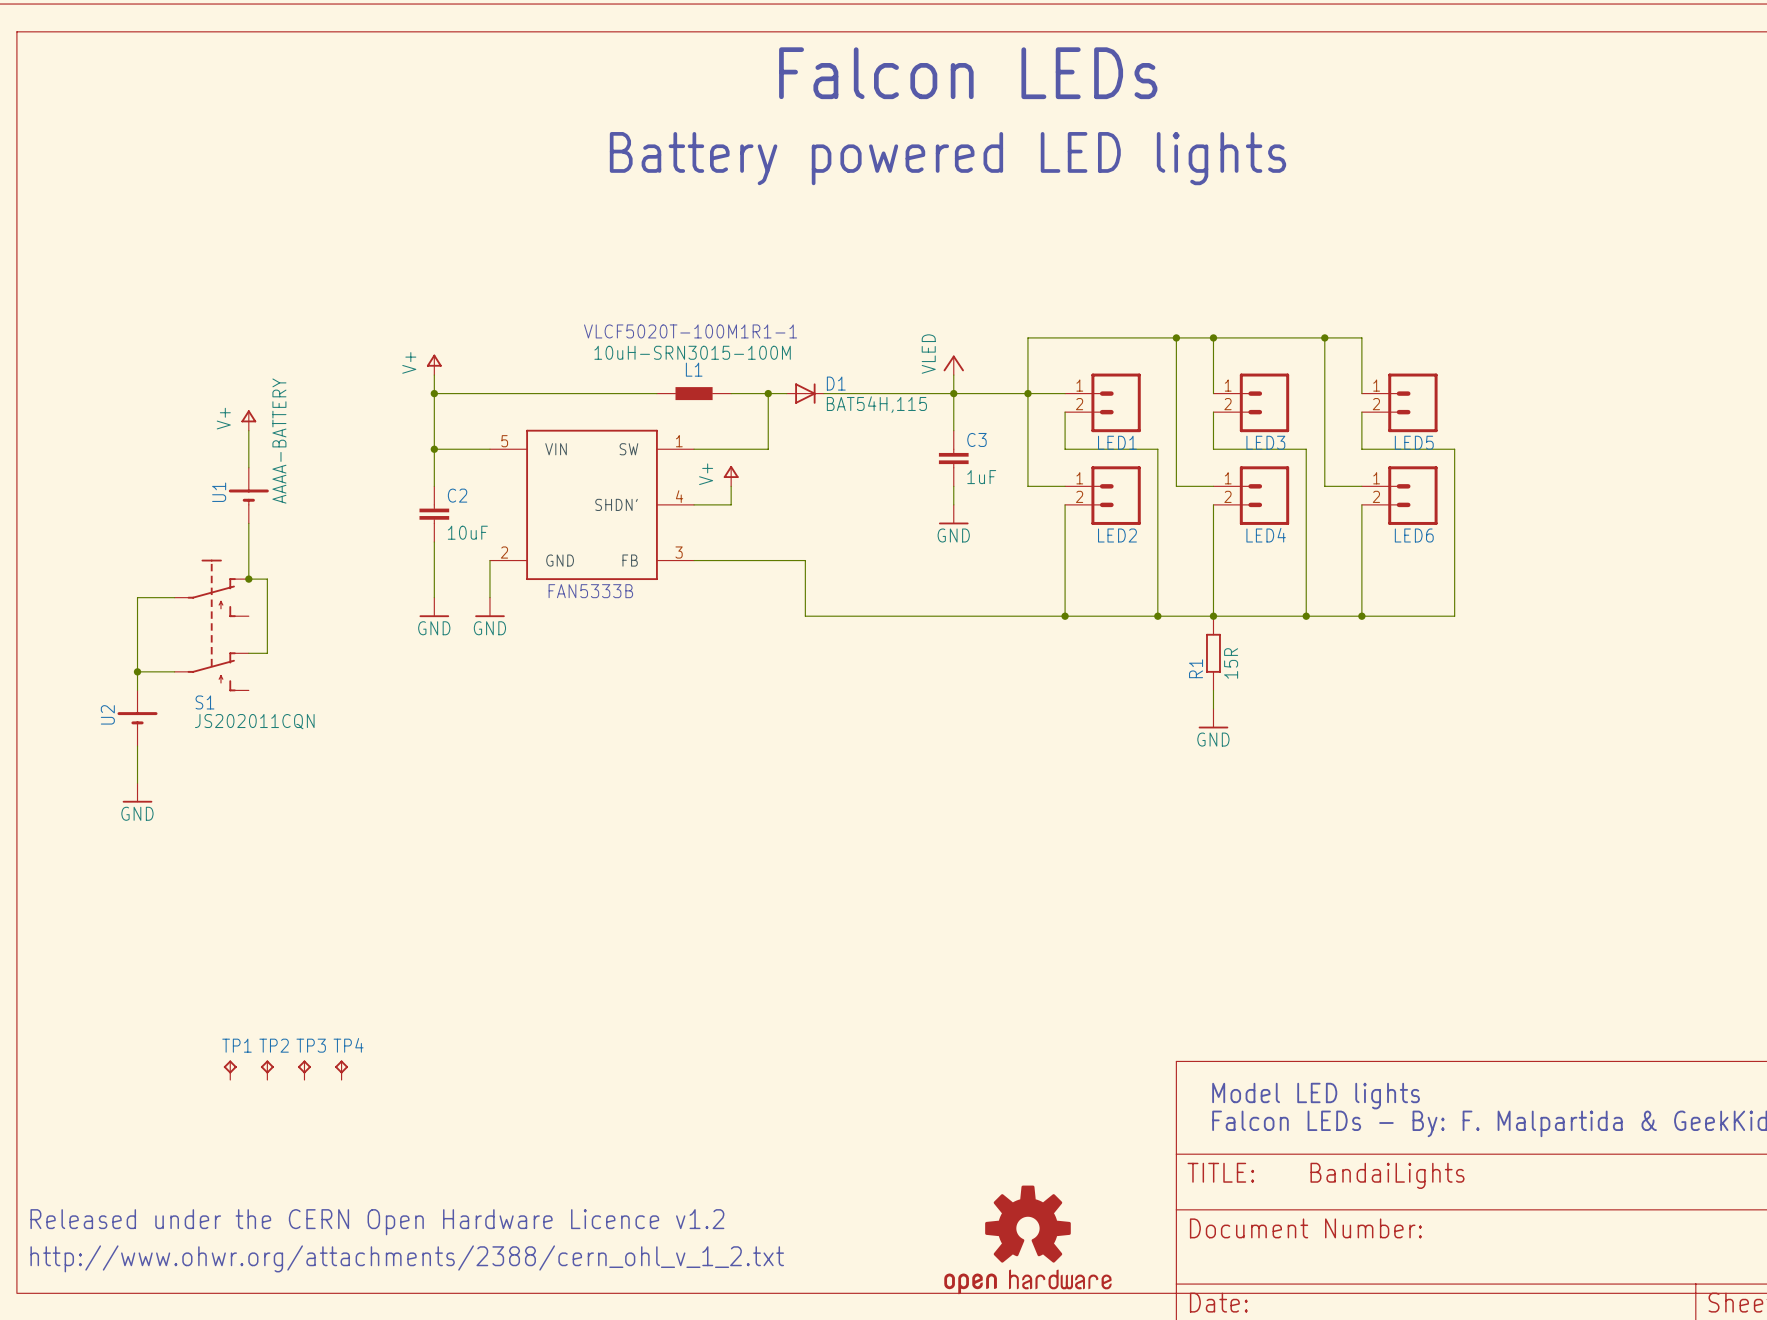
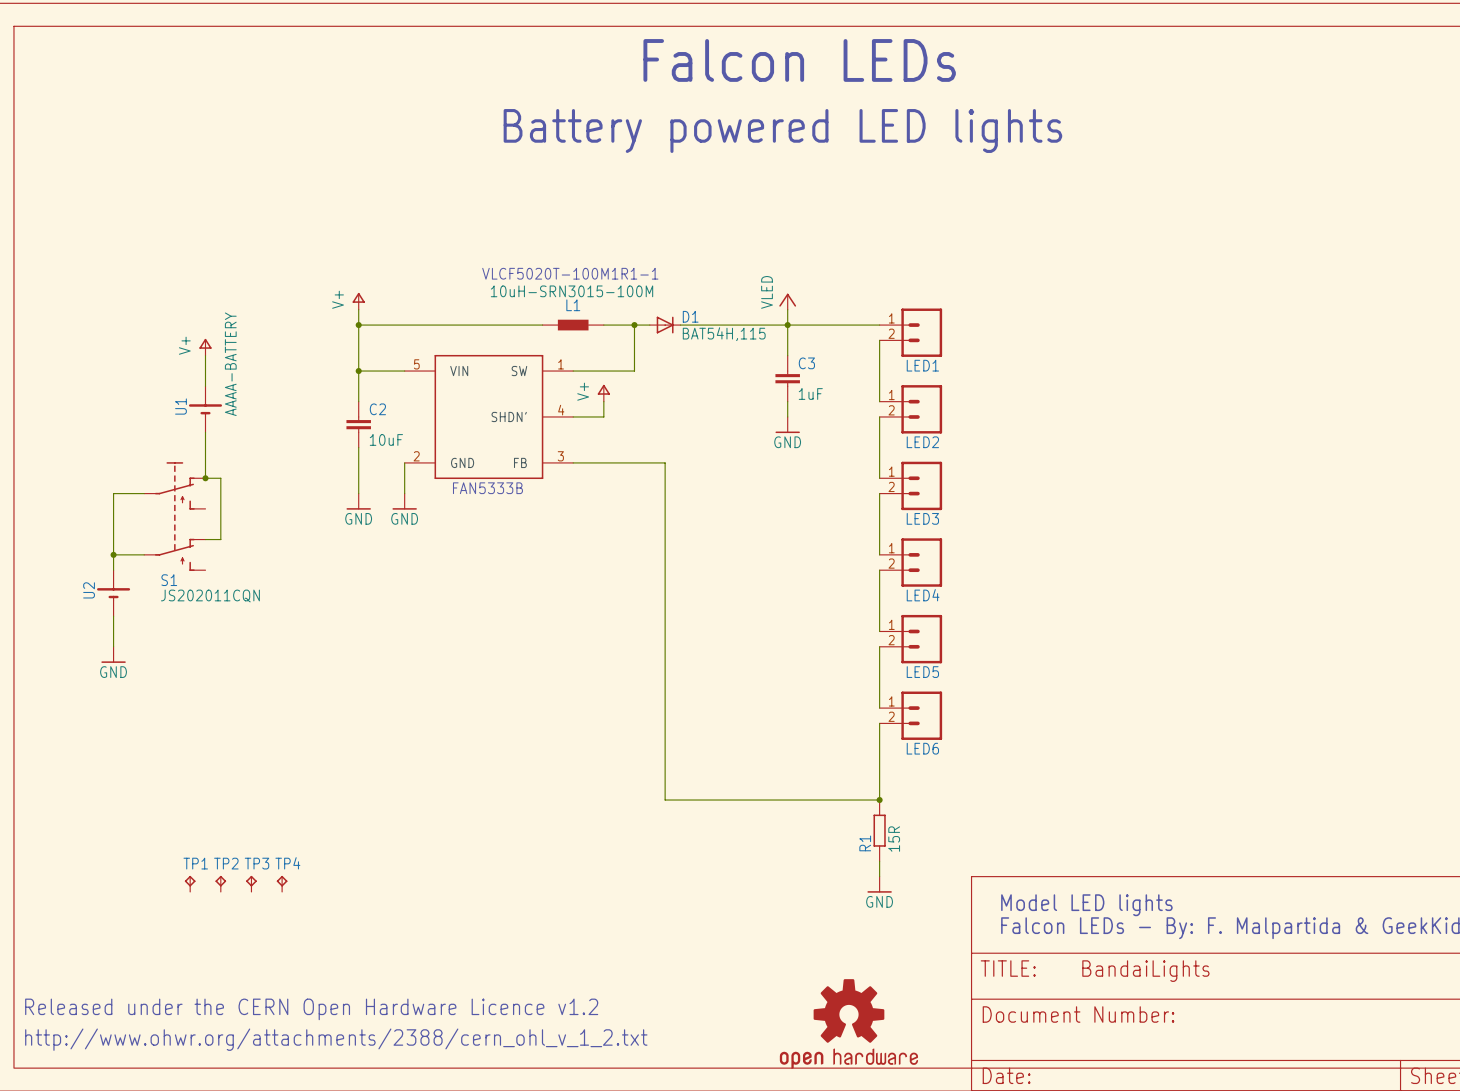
wire: (1176, 337) (1176, 486) (1213, 486) -> none
junction: (1176, 337) -> none
wire: (1213, 337) (1213, 393) -> none
junction: (1213, 337) -> none
wire: (1324, 337) (1324, 486) (1361, 486) -> none
junction: (1324, 337) -> none
junction: (1027, 393) -> none
wire: (1361, 393) (1361, 337) (1027, 337) (1027, 486) (1065, 486) -> none
LED3 position: (1251, 402) -> (910, 485)
LED5 position: (1399, 402) -> (910, 639)
wire: (1213, 412) (1213, 449) (1306, 449) (1306, 616) -> none
wire: (1361, 412) (1361, 449) (1454, 449) (1454, 616) (805, 616) -> (879, 723) (879, 800) (665, 800) (665, 508)
wire: (1065, 449) (1157, 449) (1157, 616) -> (879, 371) (879, 401)
LED4 position: (1251, 495) -> (910, 562)
LED6 position: (1399, 495) -> (910, 715)
wire: (1213, 504) (1213, 616) -> none
wire: (1361, 504) (1361, 616) -> none
wire: (1065, 579) (1065, 597) -> none
wire: none -> (879, 508) (879, 554)
junction: (1065, 616) -> none
junction: (1157, 616) -> none
junction: (1213, 616) -> none
junction: (1306, 616) -> none
junction: (1361, 616) -> none
R1 position: (1213, 653) -> (879, 830)
wire: none -> (879, 570) (879, 631)
wire: (1213, 690) (1213, 708) -> none
power symbol: GND (1213, 718) -> none
wire: none -> (879, 646) (879, 708)
junction: none -> (879, 800)
wire: none -> (879, 861) (879, 876)
power symbol: none -> GND (879, 884)

